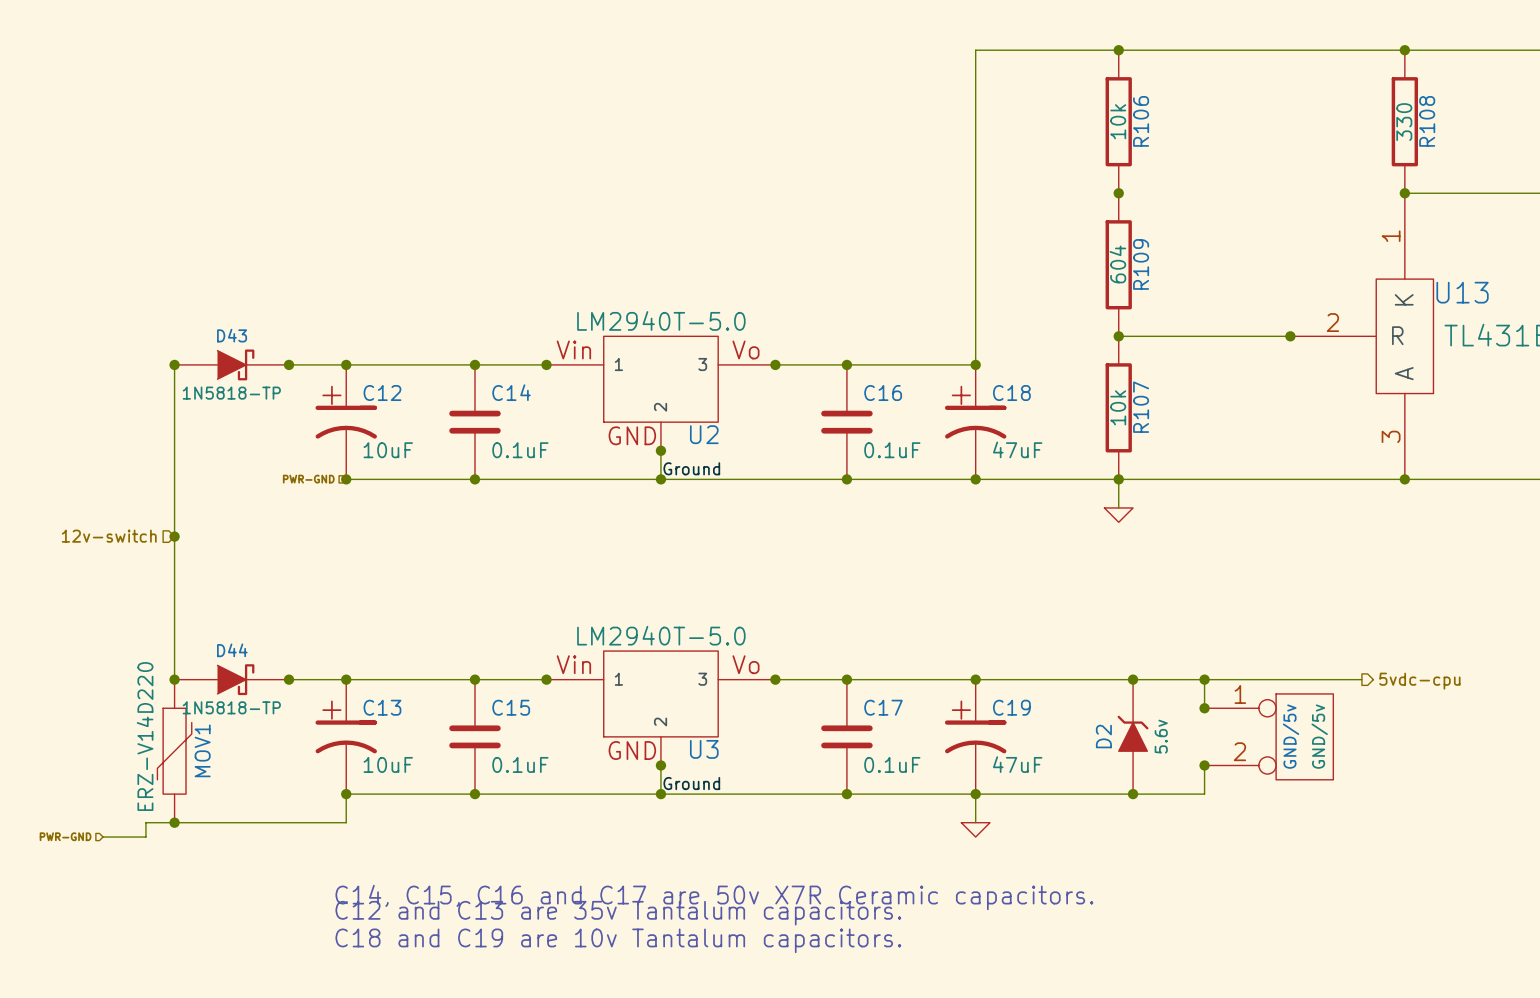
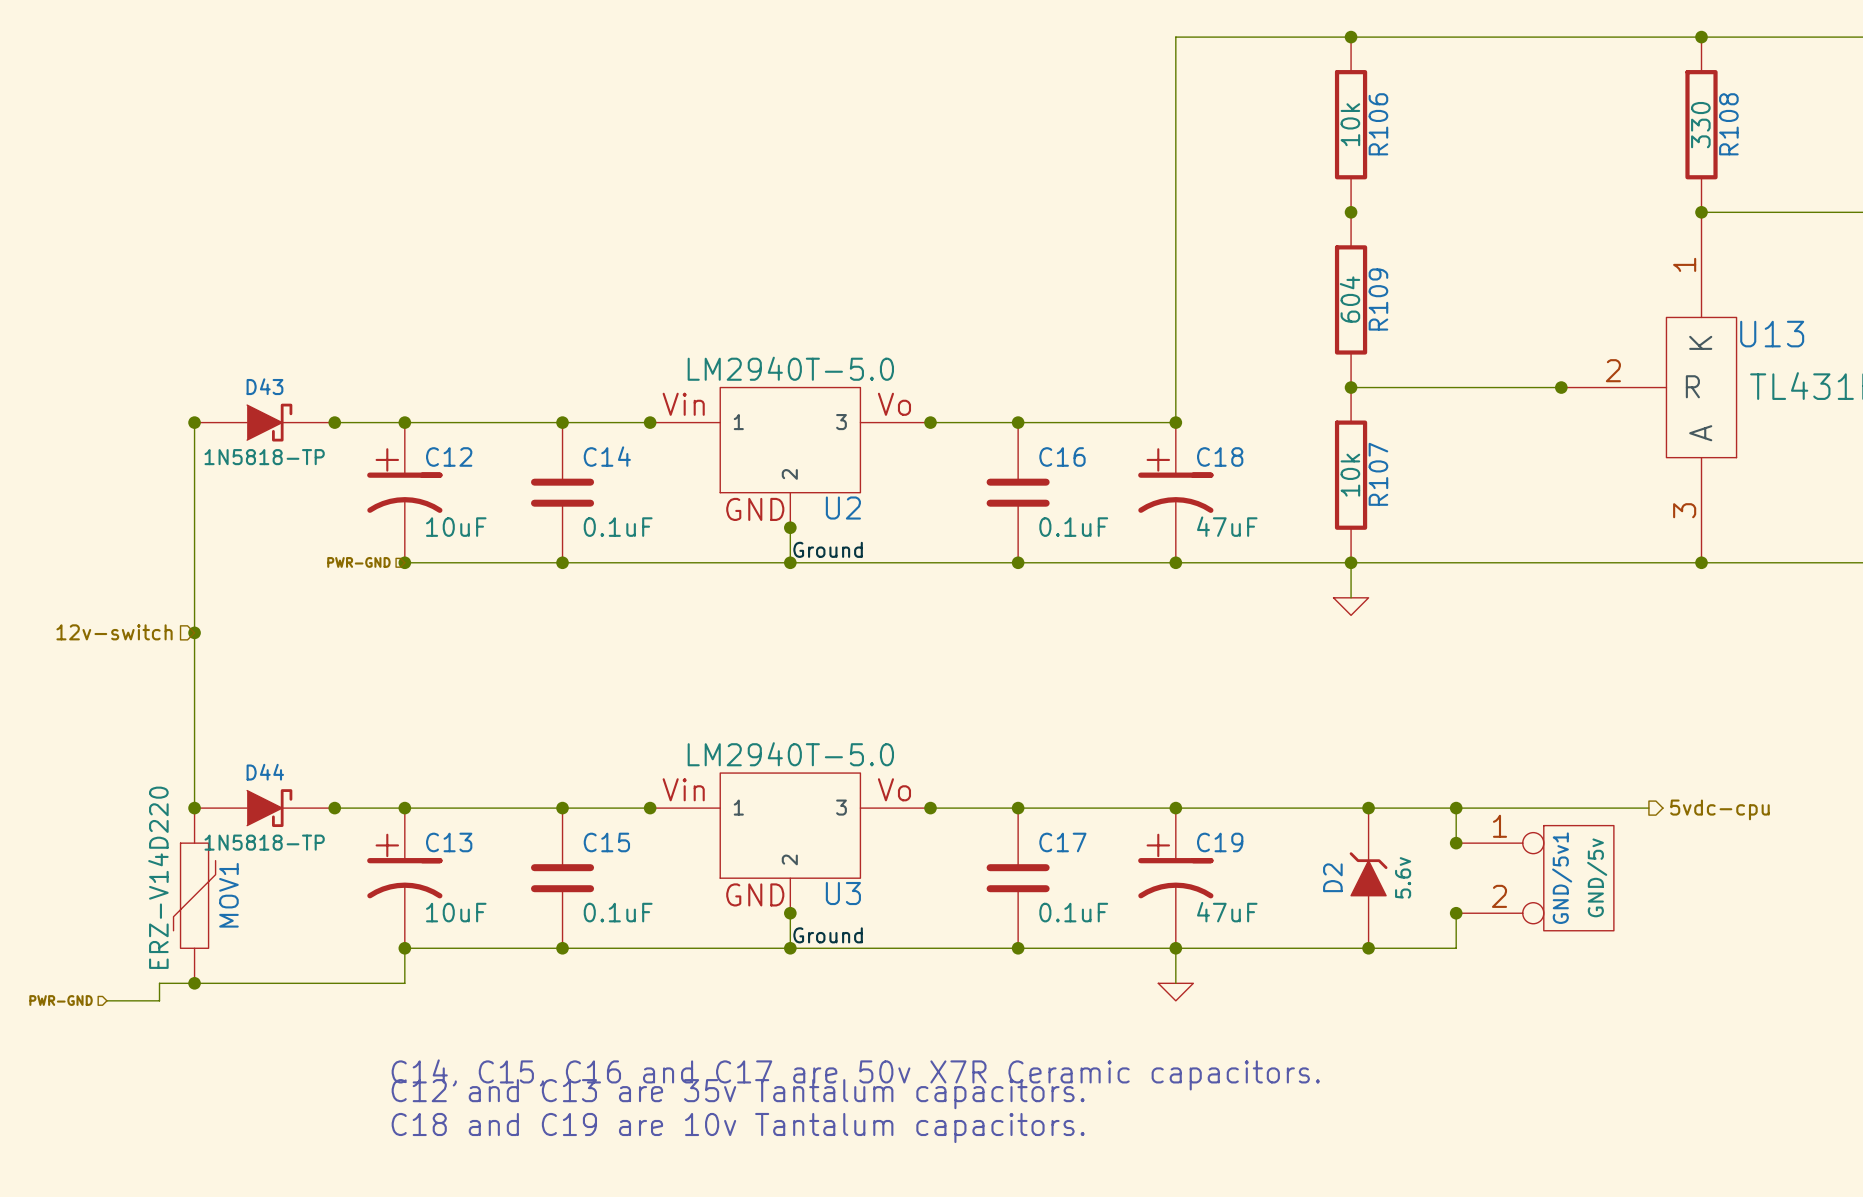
GND/5v name: GND/5v (1291, 736) -> GND/5v1 (1562, 878)

